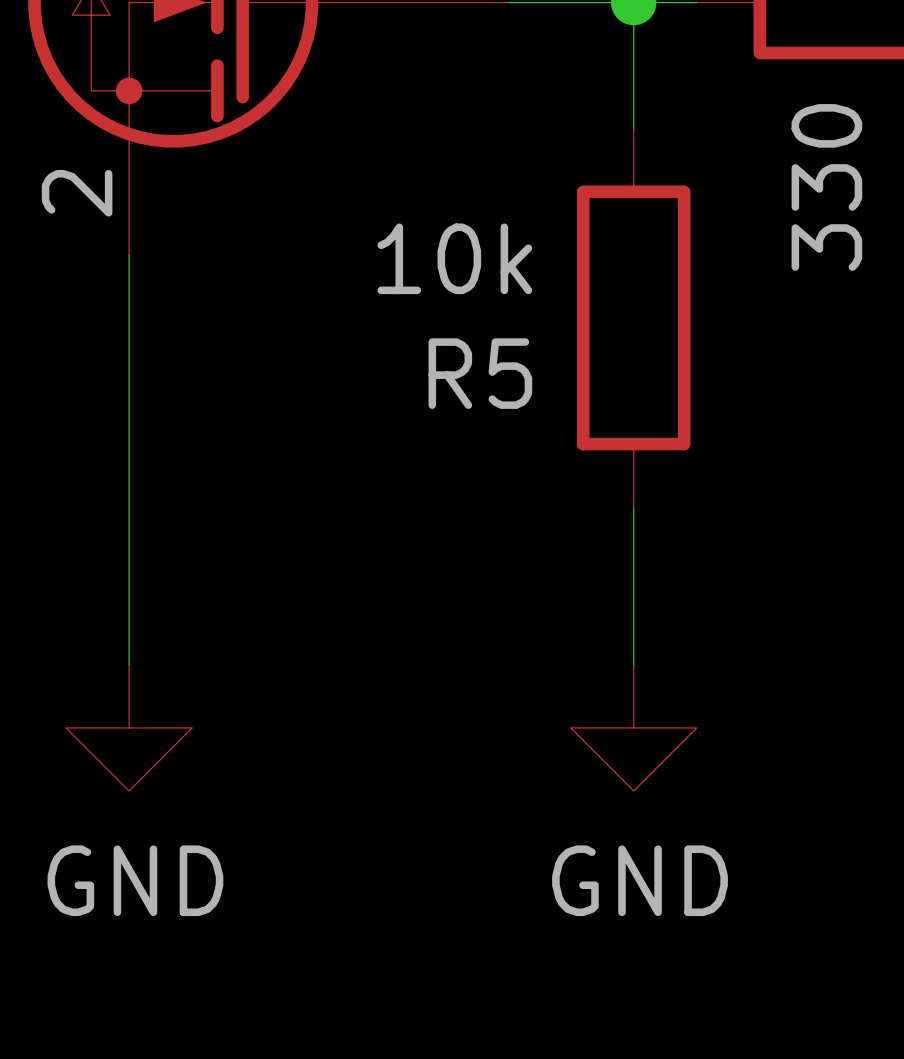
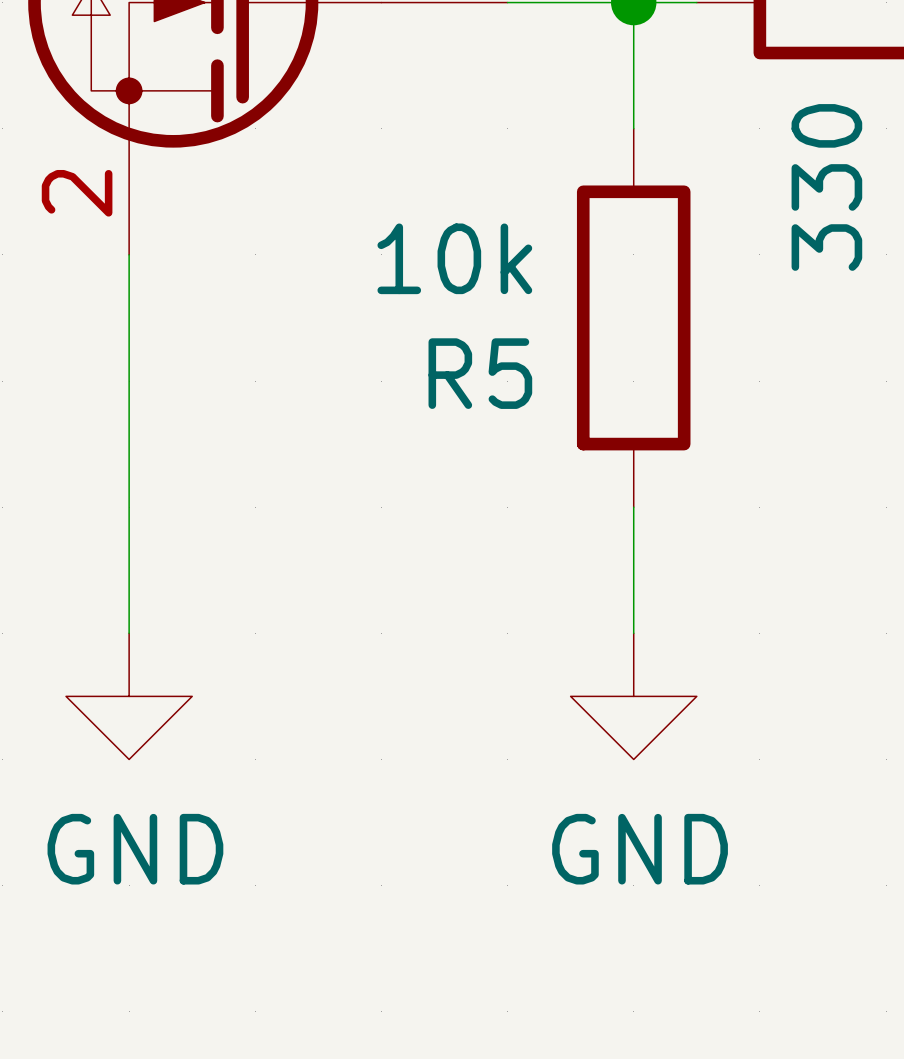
power symbol position: GND (129, 727) -> GND (129, 696)
power symbol position: GND (633, 727) -> GND (633, 696)

